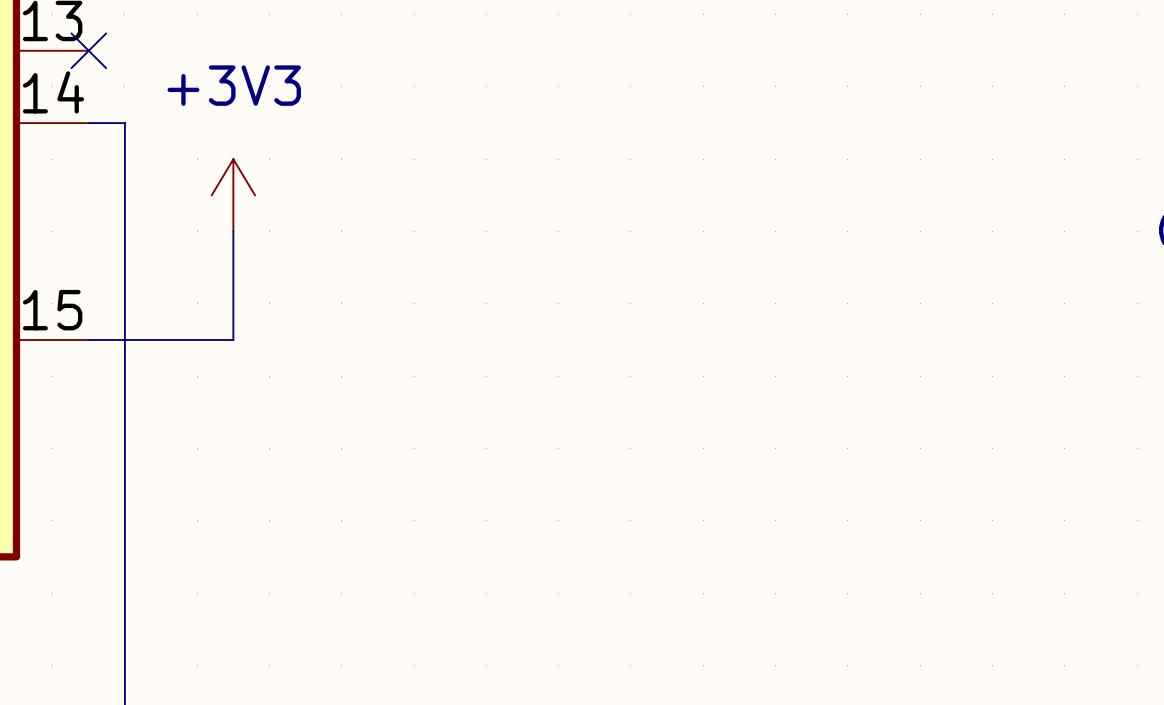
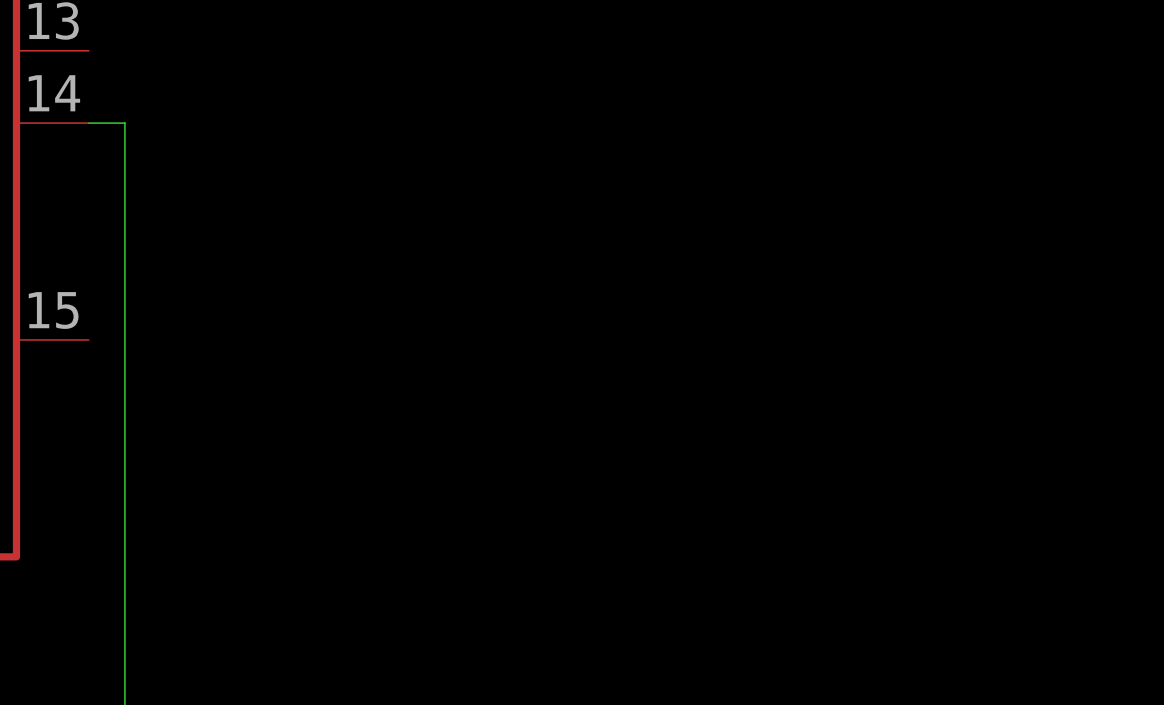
no-connect mark: (88, 50) -> none
power symbol: +3V3 (233, 195) -> none
wire: (233, 231) (233, 339) (88, 339) -> none

